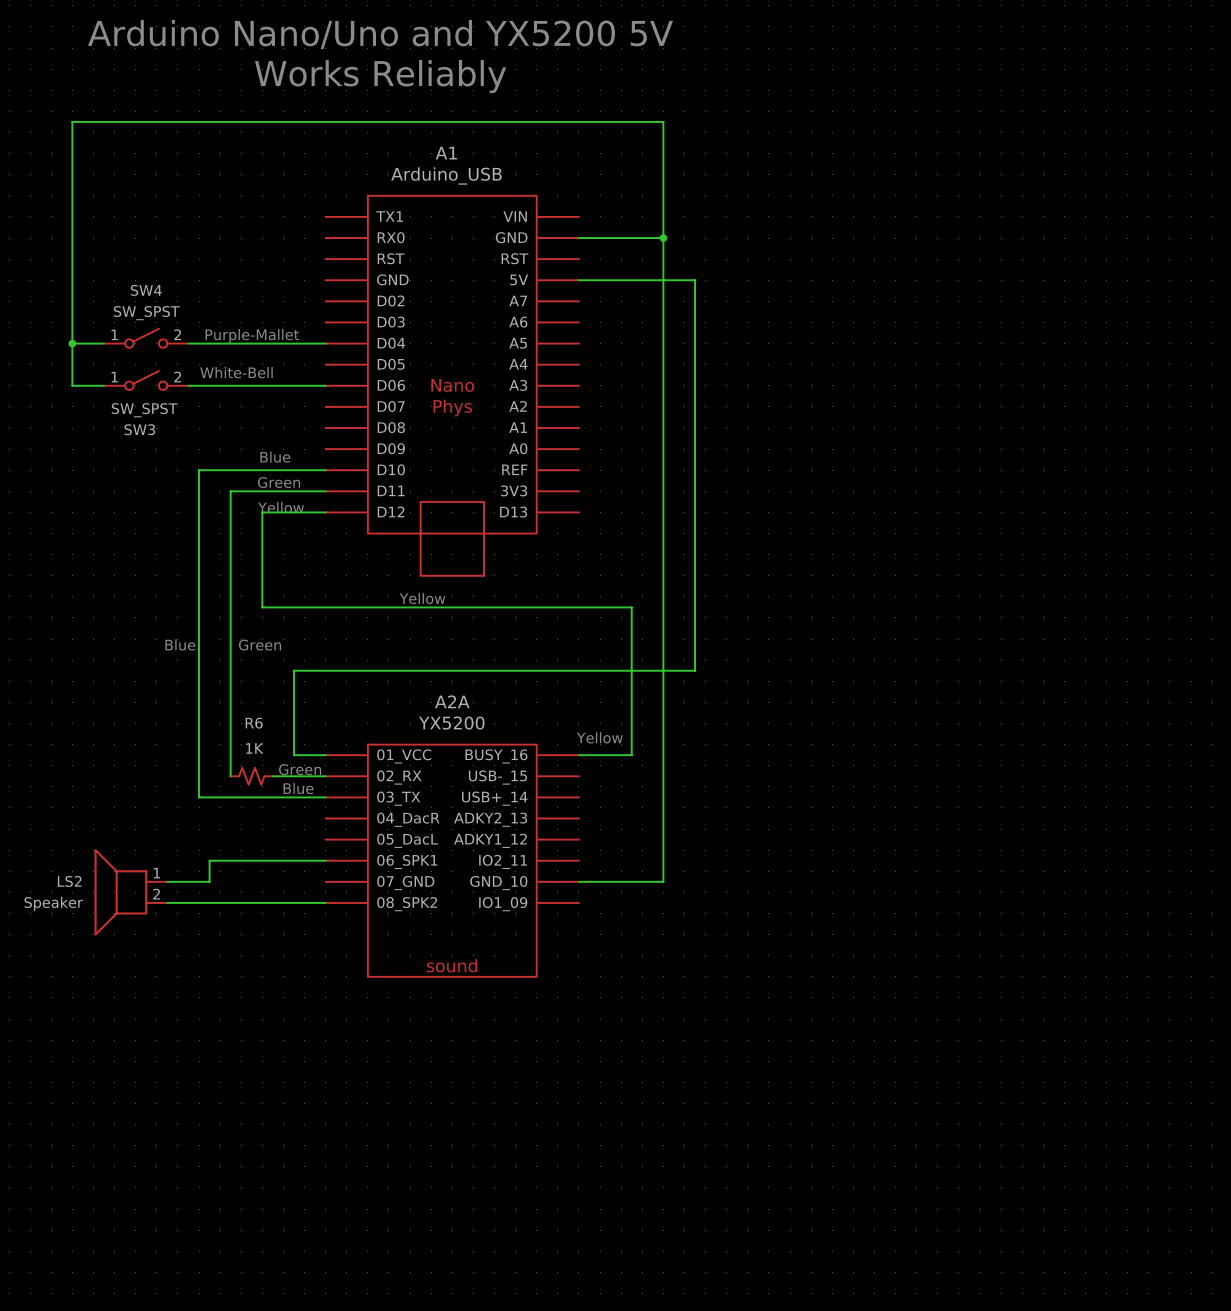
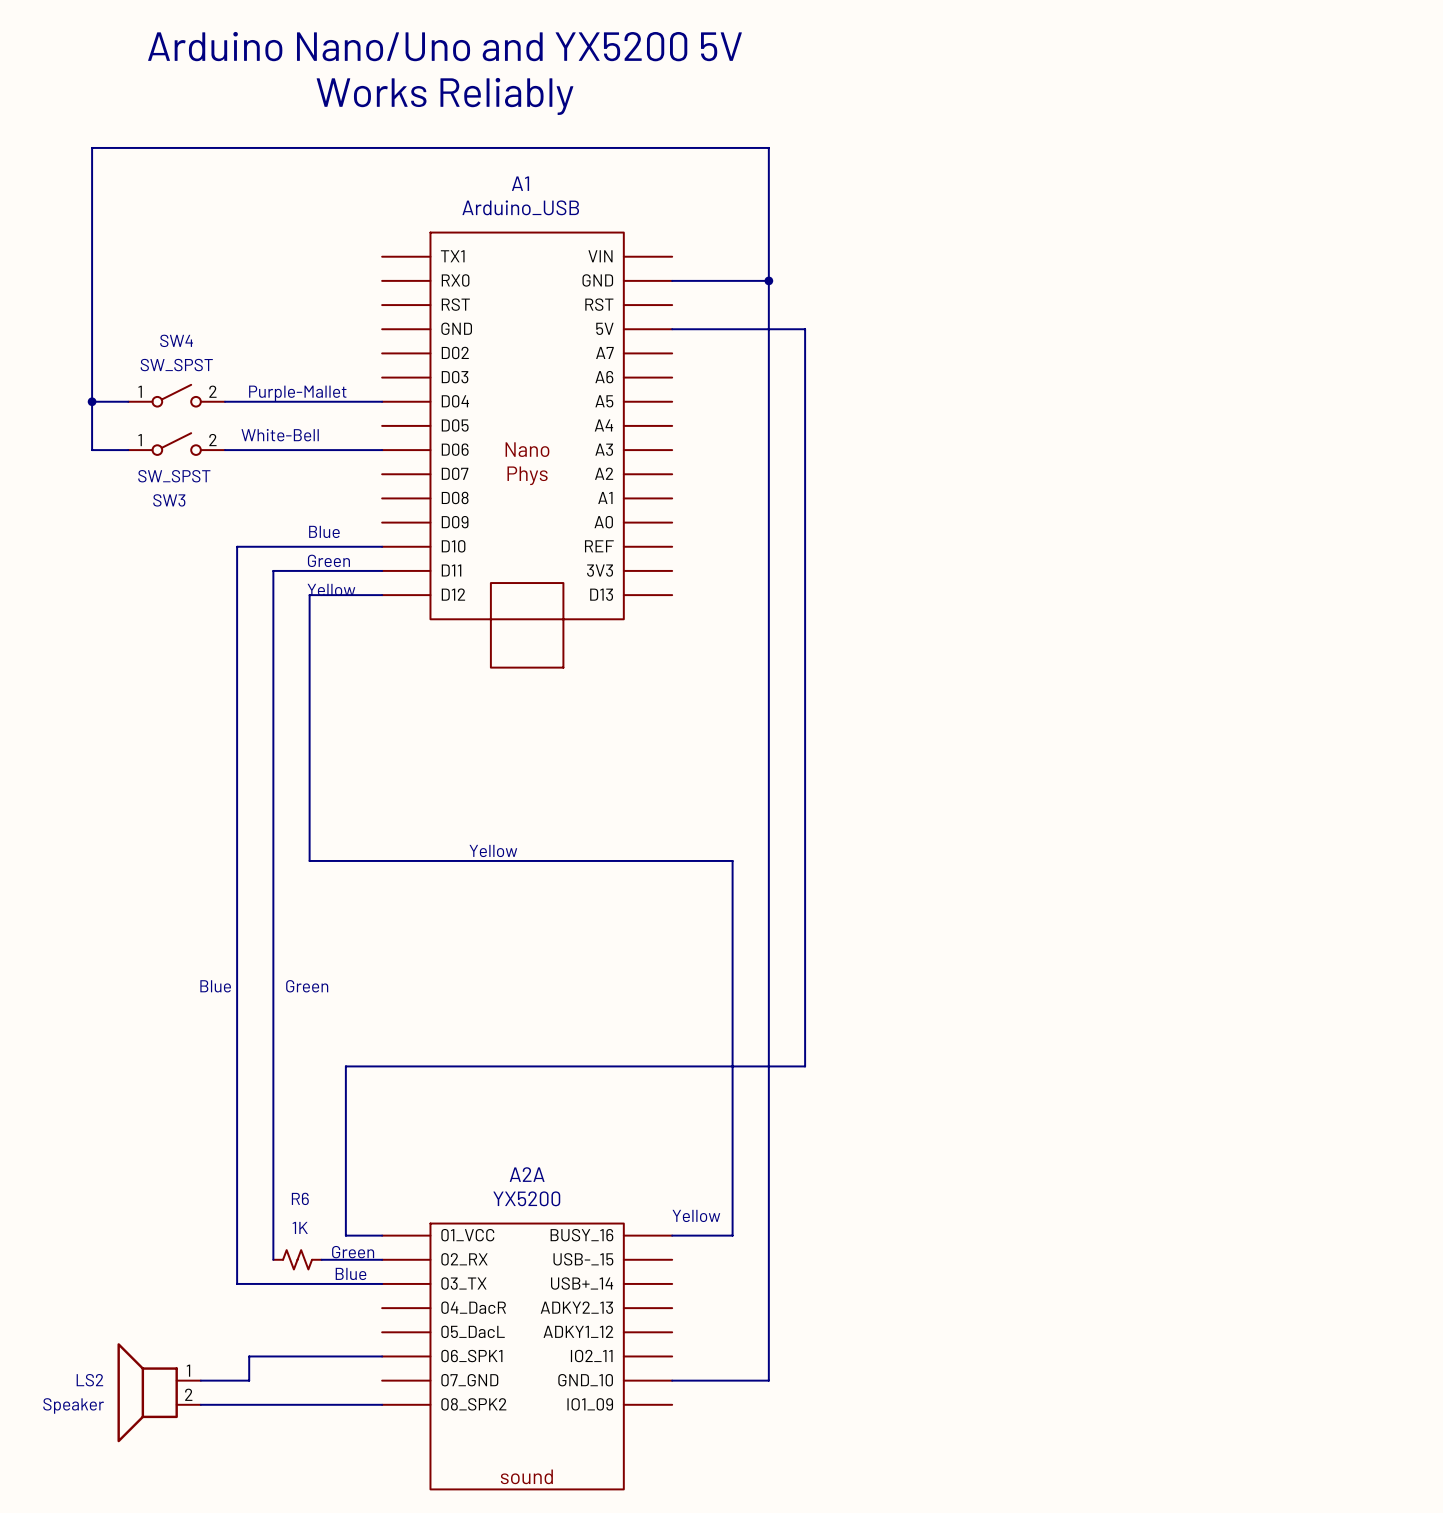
text: Yellow (422, 598) -> none
wire: (262, 607) (631, 607) (631, 744) -> (309, 703) (309, 860) (732, 860)
text: Blue (180, 644) -> none
text: Green (260, 645) -> none
wire: (695, 670) (293, 670) (293, 755) (325, 755) -> (805, 776) (805, 1066) (345, 1066) (345, 1235) (382, 1235)
text: none -> Yellow (493, 850)
text: Yellow (599, 737) -> none
wire: (578, 755) (631, 755) -> (672, 1235) (732, 1235) (732, 873)
text position: Green (300, 769) -> Green (307, 986)
wire: none -> (273, 897) (273, 1259)
R6 position: (251, 776) -> (297, 1259)
wire: (272, 776) (325, 776) -> none
text: Blue (298, 788) -> none
wire: (199, 797) (325, 797) -> (237, 921) (237, 1283) (382, 1283)
text: none -> Blue (215, 986)
wire: (325, 860) (209, 860) (209, 881) (167, 881) -> none
A2A position: (452, 860) -> (527, 1356)
wire: (578, 881) (663, 881) -> (672, 1380) (768, 1380) (768, 1018)
LS2 position: (130, 892) -> (159, 1392)
wire: (167, 902) (325, 902) -> none
text: none -> Yellow (696, 1215)
text: none -> Green (353, 1252)
wire: none -> (321, 1259) (382, 1259)
text: none -> Blue (350, 1273)
wire: none -> (382, 1356) (249, 1356) (249, 1380) (200, 1380)
wire: none -> (200, 1404) (382, 1404)

